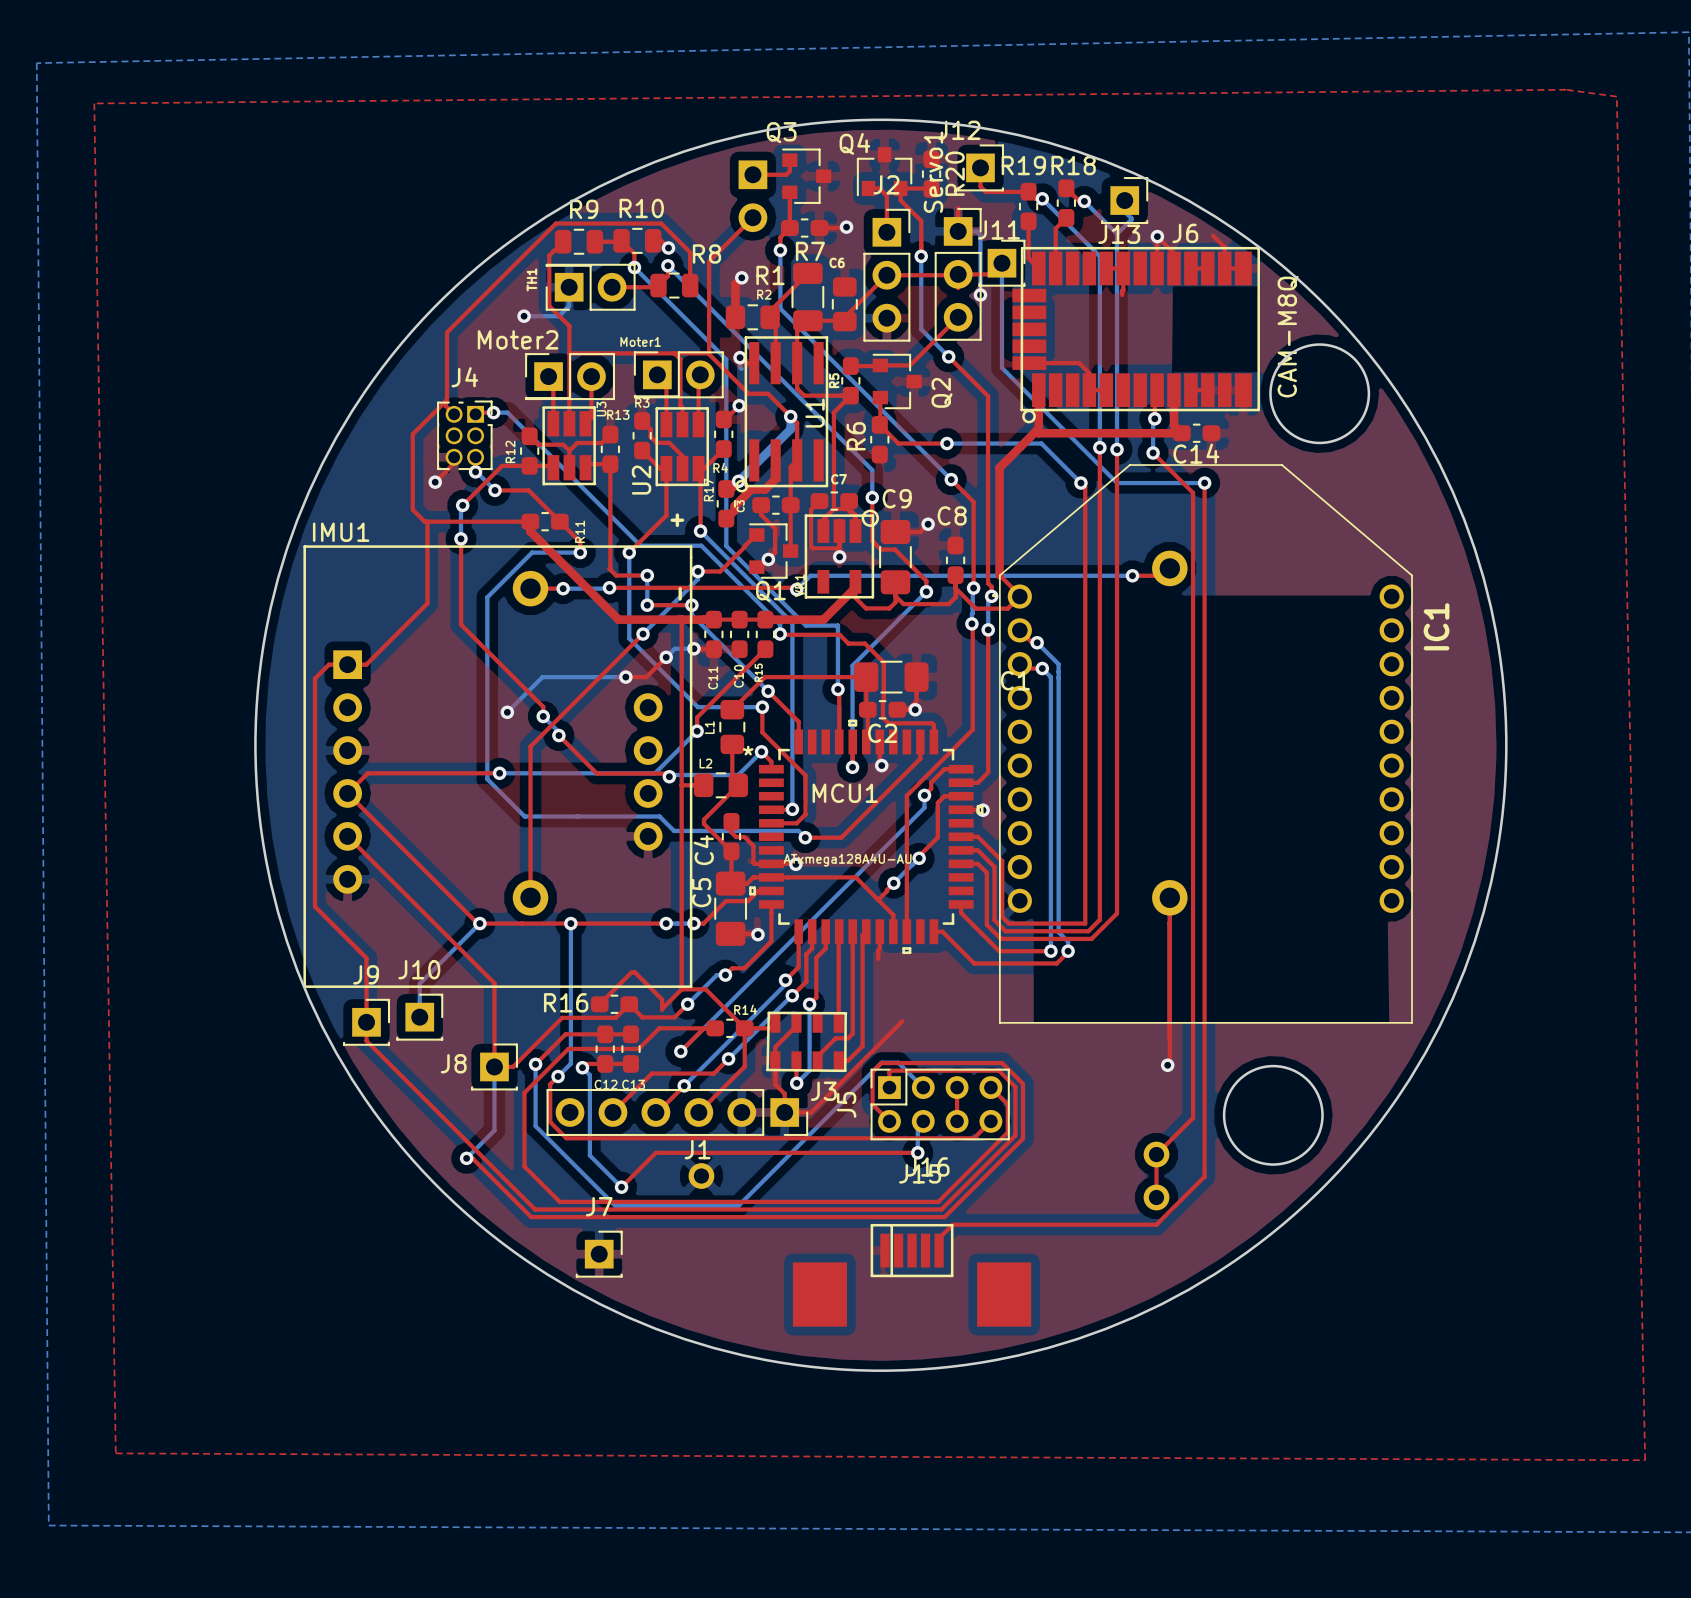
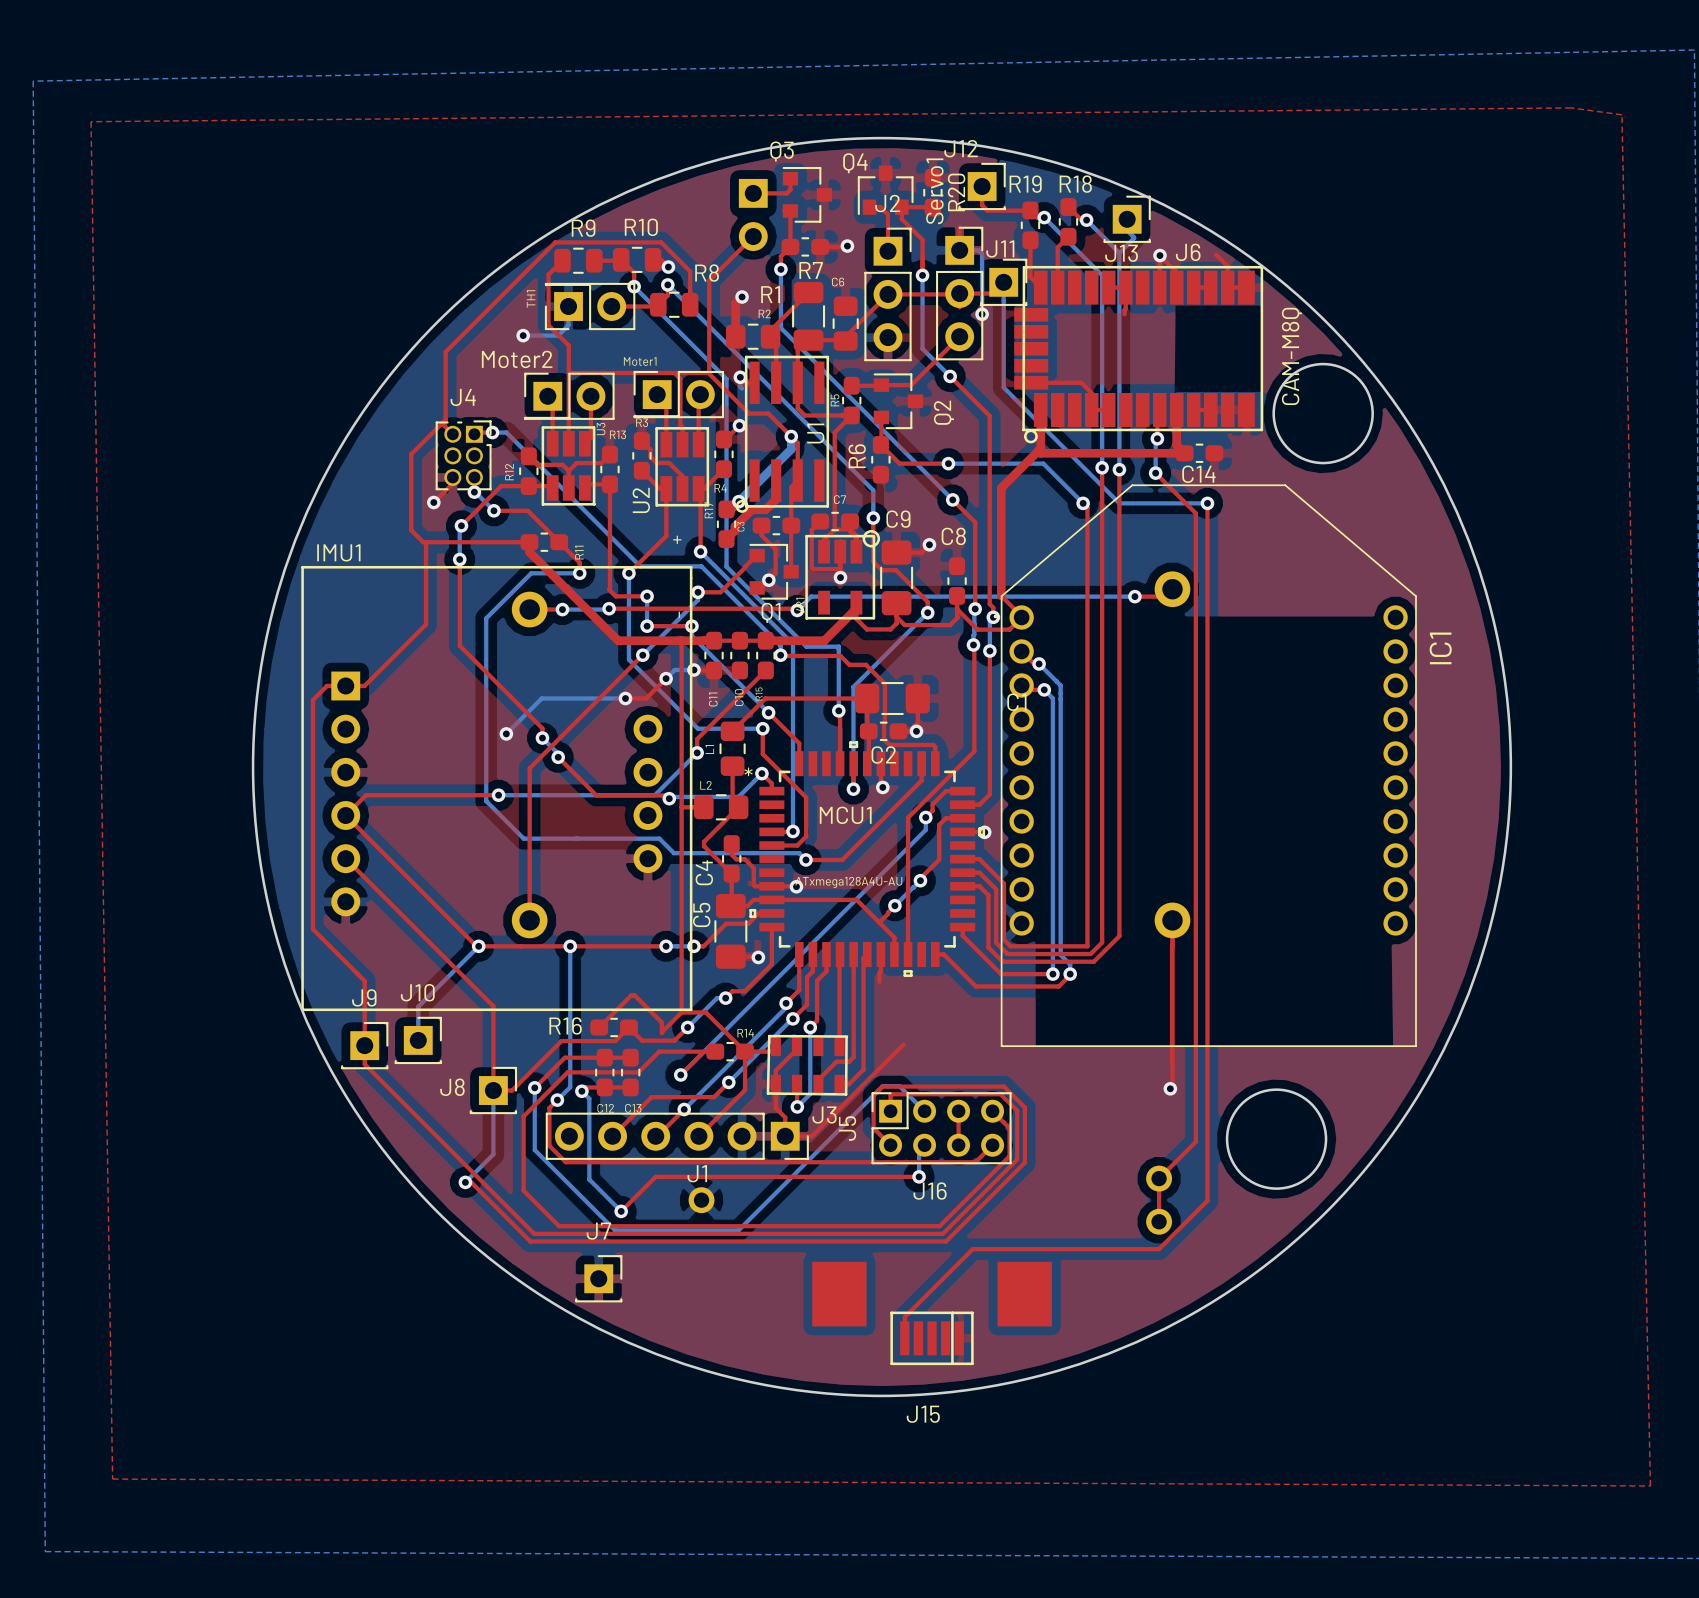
top track: (971, 1224) (952, 1224) (939, 1238) (939, 1250) -> (972, 1249) (904, 1317) (904, 1338)
J15 rotation: 0° (912, 1275) -> 180° (932, 1313)

